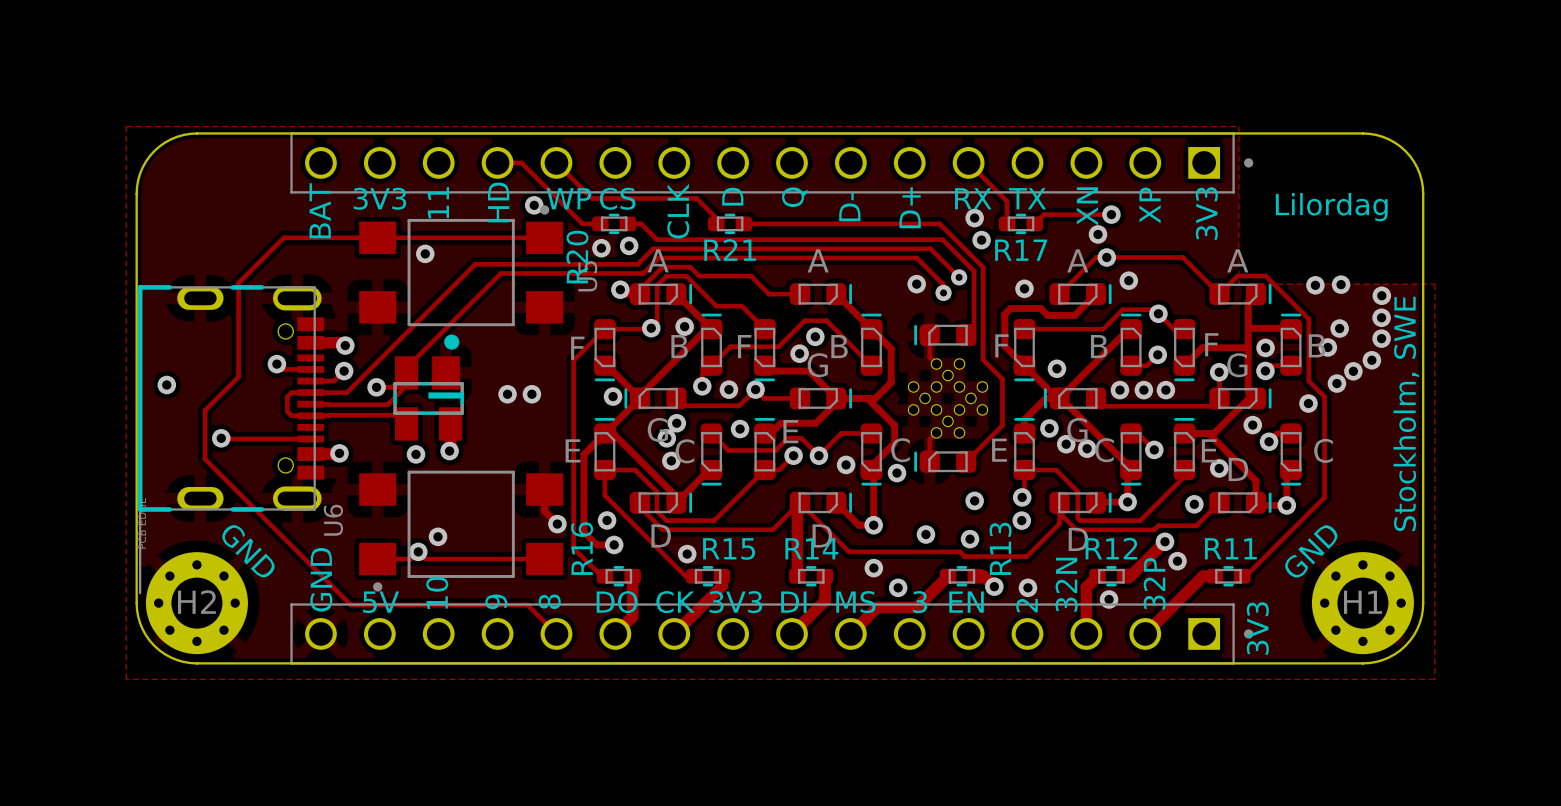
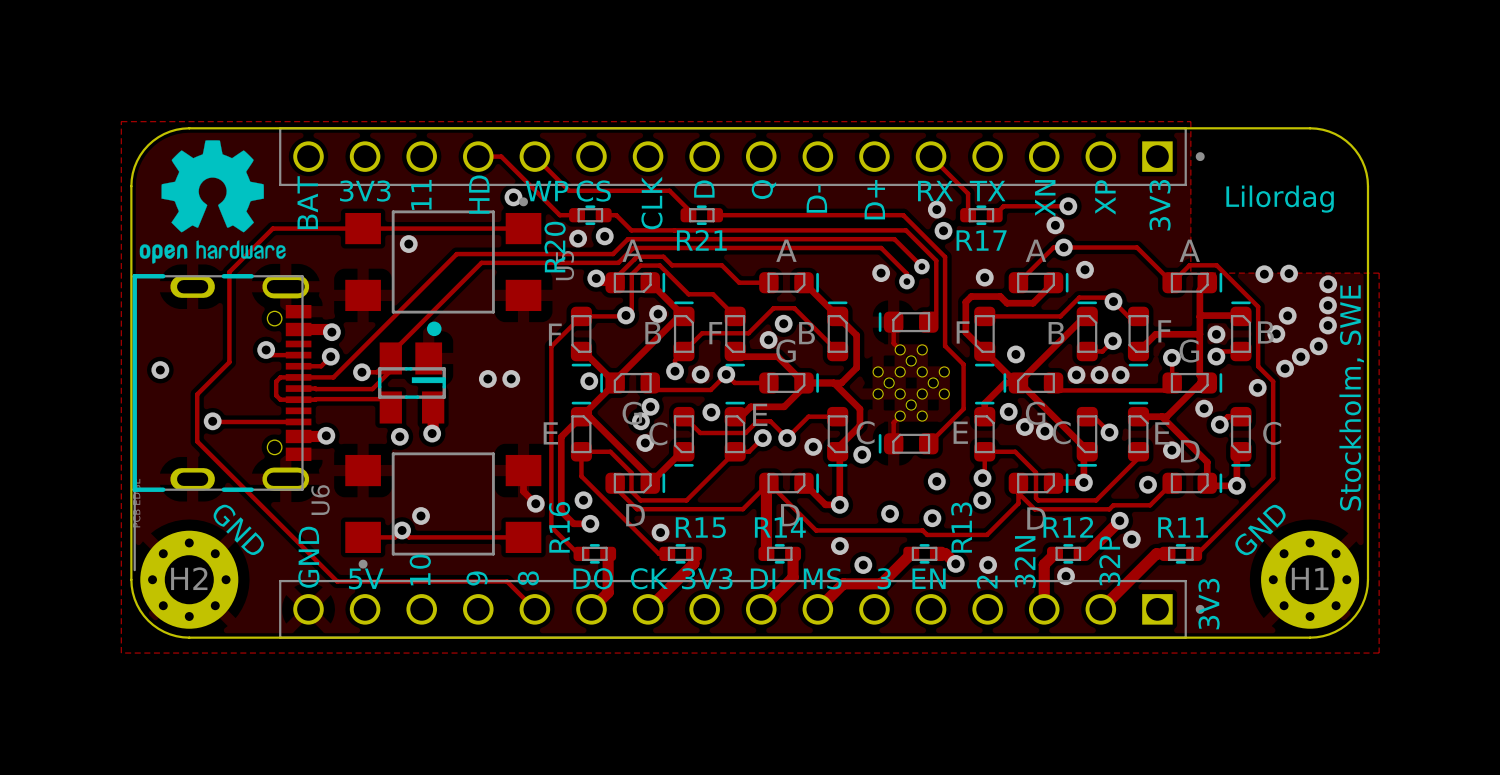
drawing: none -> [139, 140, 286, 264]

